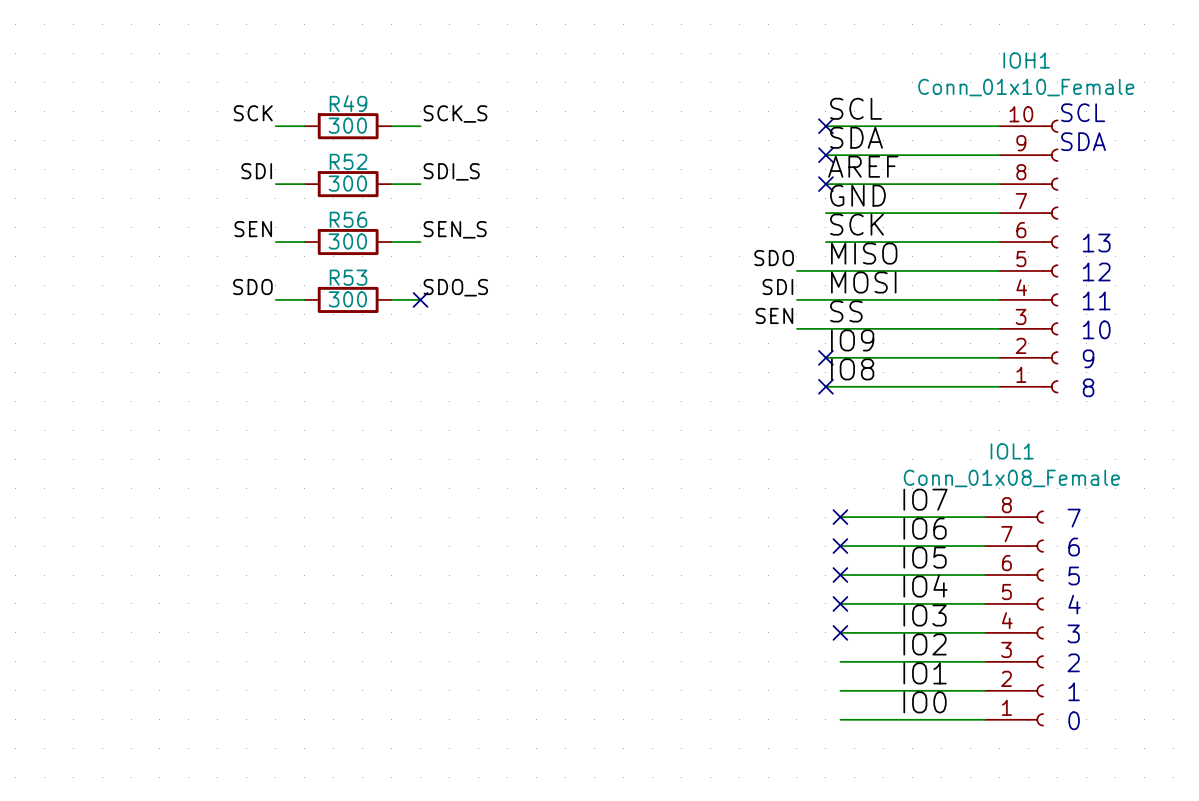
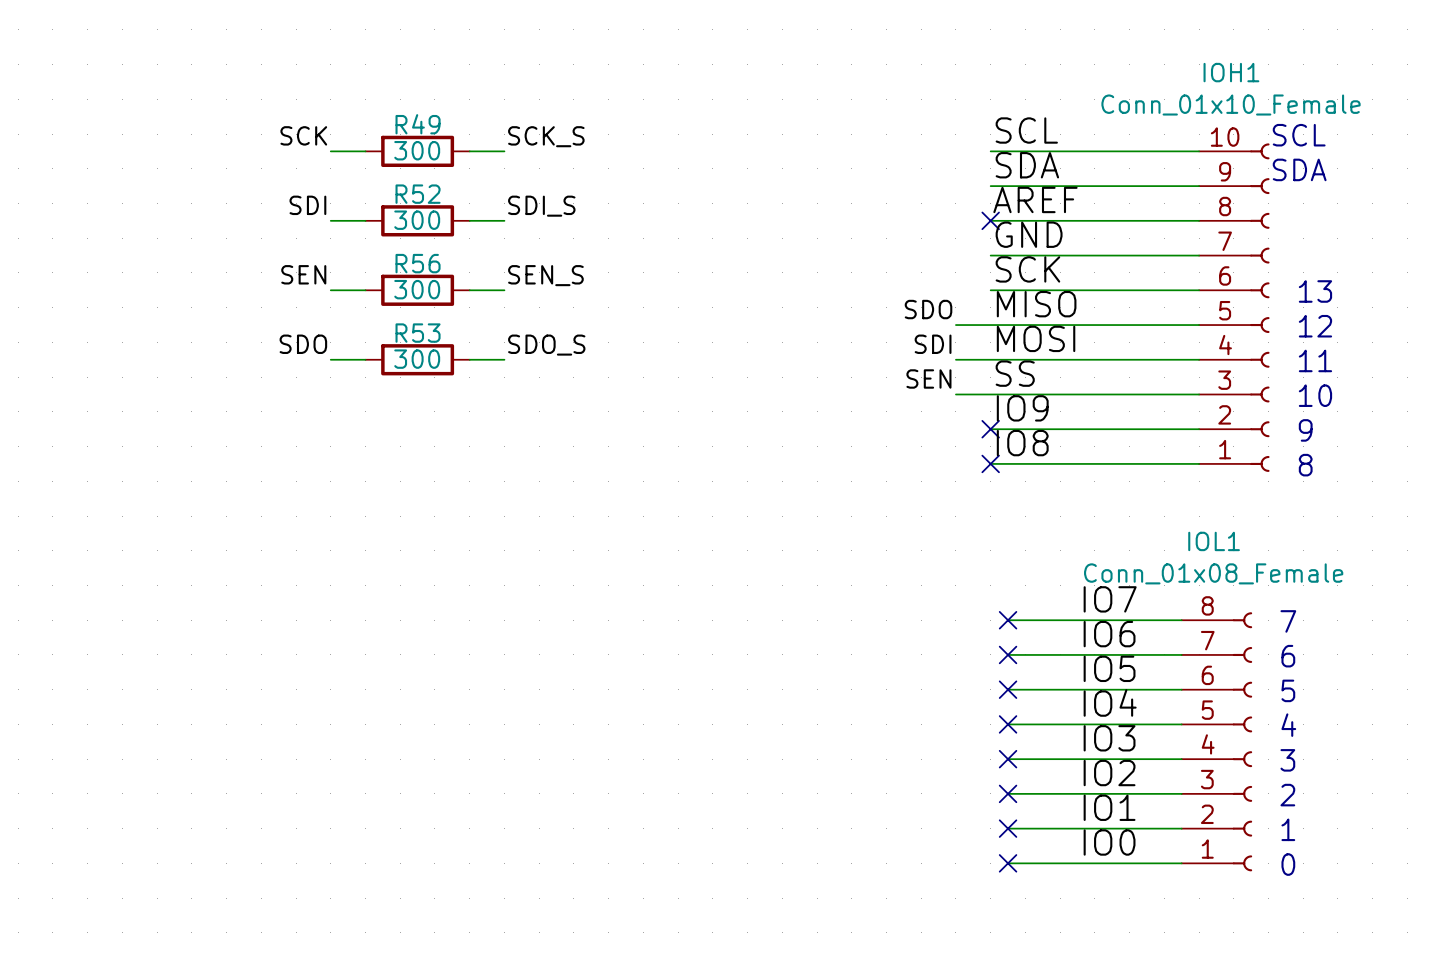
no-connect mark: (825, 126) -> none
no-connect mark: (825, 155) -> none
no-connect mark: (420, 299) -> none
no-connect mark: none -> (1008, 793)
no-connect mark: none -> (1008, 828)
no-connect mark: none -> (1008, 863)

